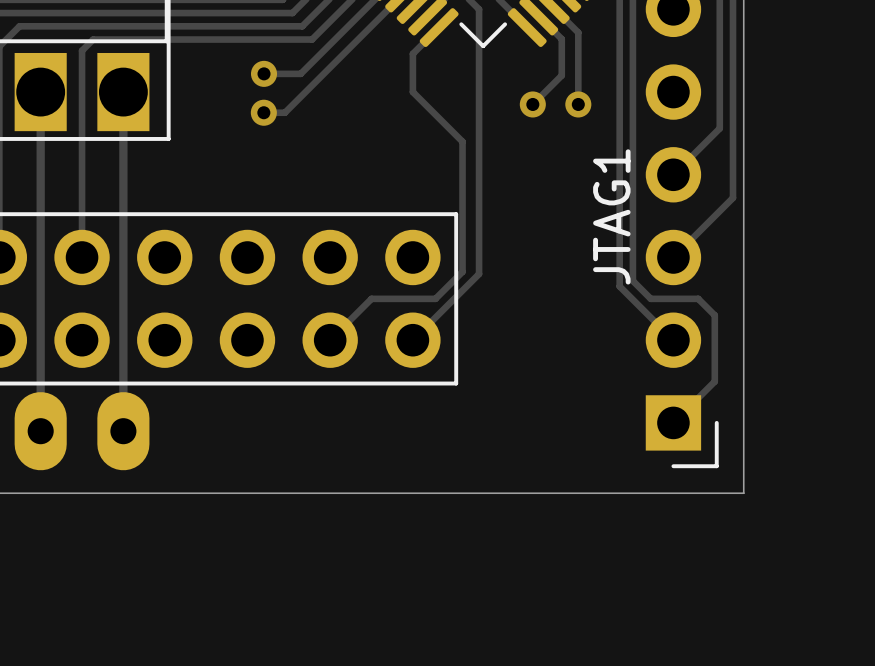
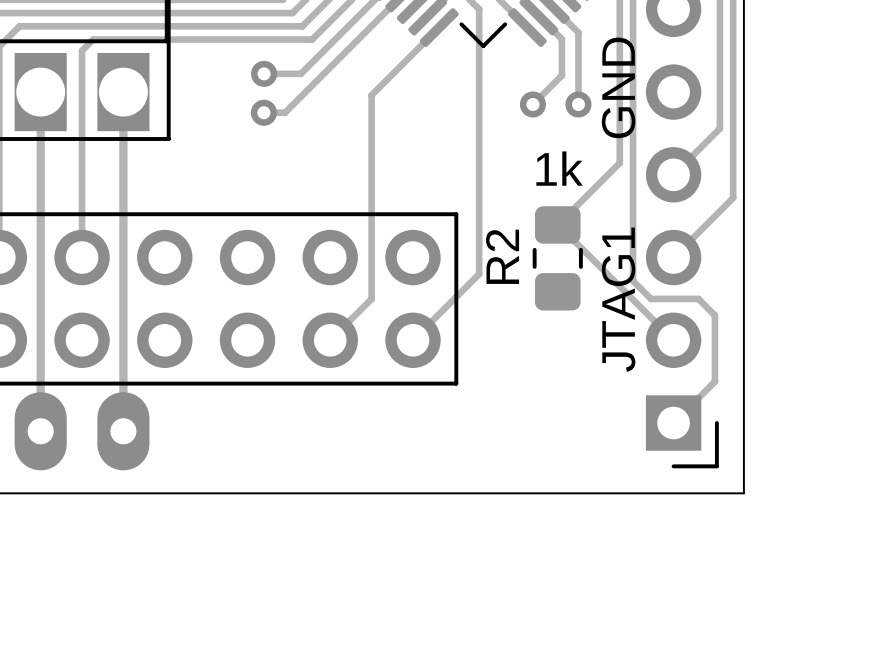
track: (412, 53) (412, 92) (462, 141) (462, 271) (435, 298) (371, 298) -> (412, 53) (371, 95) (371, 298)
text: none -> GND (618, 87)
track: (619, 162) (619, 286) -> (558, 224) (619, 286)
track: none -> (619, 162) (557, 224)
text: none -> 1k (559, 168)
JTAG1 name position: JTAG1 (611, 216) -> JTAG1 (618, 299)
R2: none -> (557, 258)

